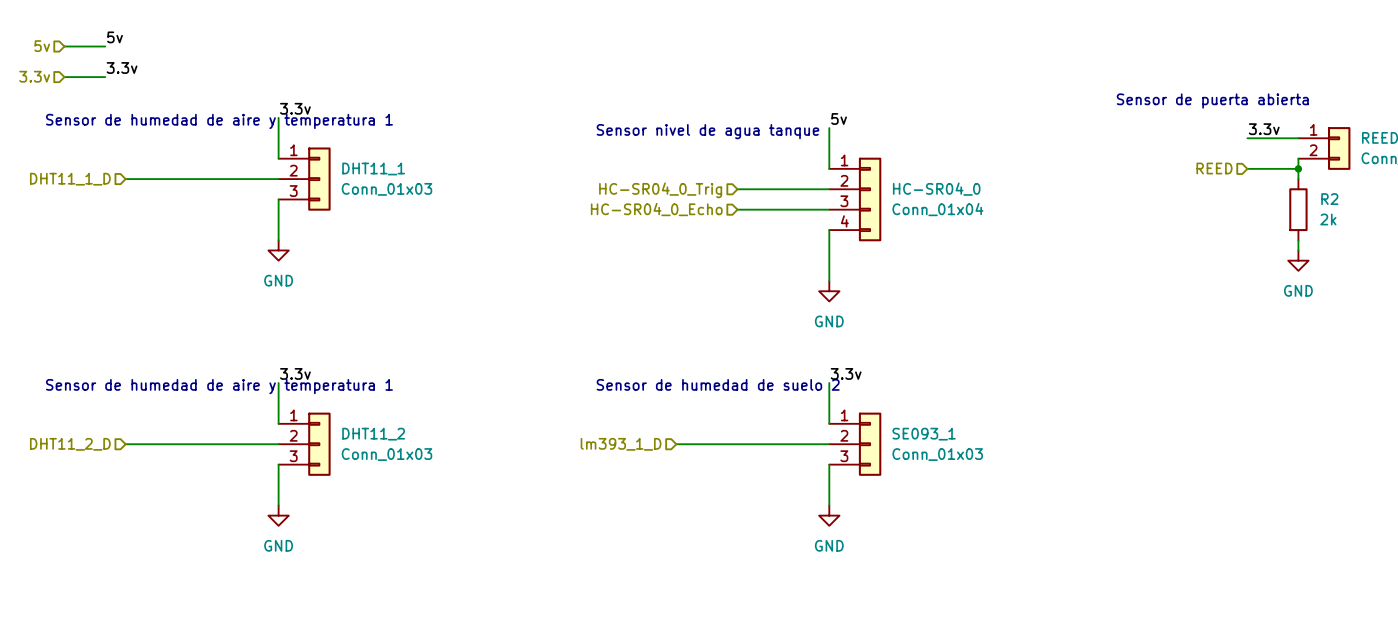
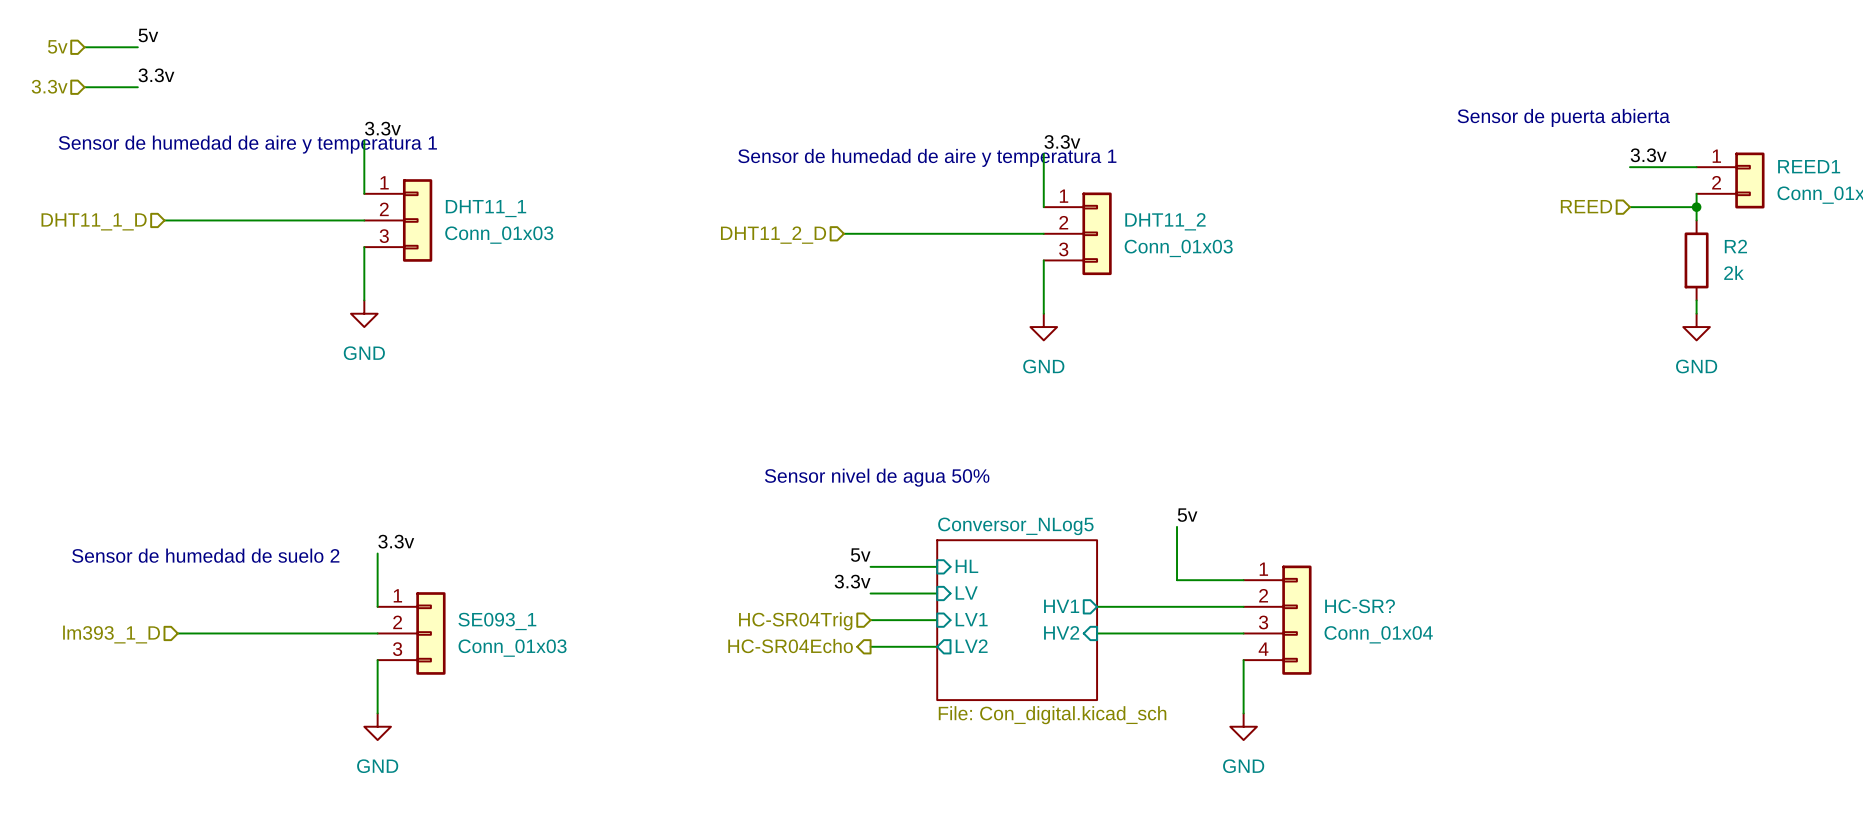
label: none -> 3.3v (1062, 141)
label: 5v (839, 118) -> none
wire: (829, 128) (829, 168) -> (1043, 153) (1043, 207)
text: Sensor nivel de agua tanque (707, 131) -> none
text: none -> Sensor de humedad de aire y temperatura 1 (927, 157)
hierarchical label: none -> DHT11_2_D (773, 235)
hierarchical label: HC-SR04_0_Trig (660, 190) -> none
HC-SR04_0: Conn_01x04 (855, 199) -> none
hierarchical label: HC-SR04_0_Echo (656, 209) -> none
wire: (737, 209) (829, 209) -> (843, 233) (963, 233)
wire: (829, 230) (829, 281) -> none
power symbol position: GND (829, 291) -> GND (1043, 327)
label position: 3.3v (295, 373) -> 3.3v (396, 541)
label: 3.3v (846, 373) -> none
text: none -> Sensor nivel de agua 50% (877, 477)
wire: (278, 383) (278, 423) -> (377, 553) (377, 606)
wire: (829, 383) (829, 423) -> (1043, 260) (1043, 313)
text: Sensor de humedad de suelo 2 (718, 384) -> none
text: Sensor de humedad de aire y temperatura 1 (219, 386) -> none
label: none -> 5v (1187, 515)
wire: none -> (1177, 526) (1177, 580) (1243, 580)
text: none -> Sensor de humedad de suelo 2 (205, 555)
label: none -> 5v (860, 555)
sheet pin: none -> HL (966, 566)
hierarchical label: DHT11_2_D (70, 444) -> none
wire: (125, 444) (278, 444) -> (177, 633) (377, 633)
DHT11_2 position: (304, 444) -> (1077, 233)
hierarchical label: lm393_1_D (621, 444) -> none
wire: none -> (870, 566) (883, 566)
wire: (717, 444) (829, 444) -> (1097, 633) (1243, 633)
SE093_1 position: (855, 444) -> (411, 633)
label: none -> 3.3v (852, 581)
wire: (278, 464) (278, 505) -> (377, 660) (377, 713)
wire: none -> (870, 593) (937, 593)
sheet pin: none -> LV (966, 593)
wire: (829, 464) (829, 505) -> (1243, 660) (1243, 713)
sheet pin: none -> HV1 (1061, 606)
wire: none -> (1097, 606) (1243, 606)
sheet pin: none -> LV1 (971, 619)
wire: none -> (870, 620) (937, 620)
sheet Conversor_NLog5: none -> File: Con_digital.kicad_sch (1017, 620)
HC-SR?: none -> Conn_01x04 (1277, 620)
hierarchical label: none -> HC-SR04Trig (795, 621)
sheet pin: none -> HV2 (1061, 632)
hierarchical label: none -> lm393_1_D (111, 634)
hierarchical label: none -> HC-SR04Echo (790, 646)
wire: none -> (870, 646) (937, 646)
sheet pin: none -> LV2 (971, 646)
power symbol position: GND (278, 515) -> GND (377, 726)
power symbol: GND (829, 515) -> none
power symbol: none -> GND (1243, 726)

